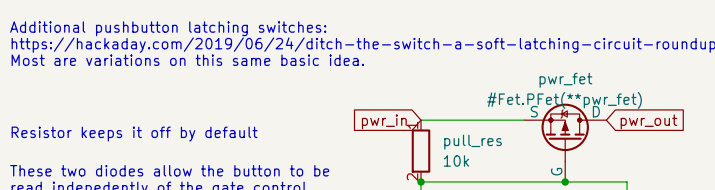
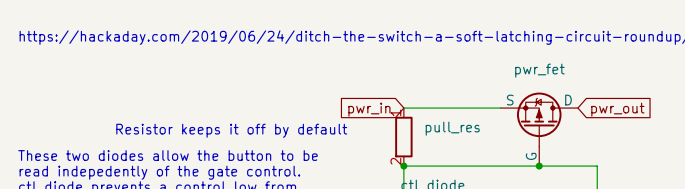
text: Additional pushbutton latching switches: (168, 28) -> none
text: Most are variations on this same basic idea. (187, 60) -> none
pwr_fet value: #Fet.PFet(**pwr_fet) (564, 100) -> none
text position: Resistor keeps it off by default (134, 134) -> Resistor keeps it off by default (231, 130)
pull_res value: 10k (456, 160) -> none

